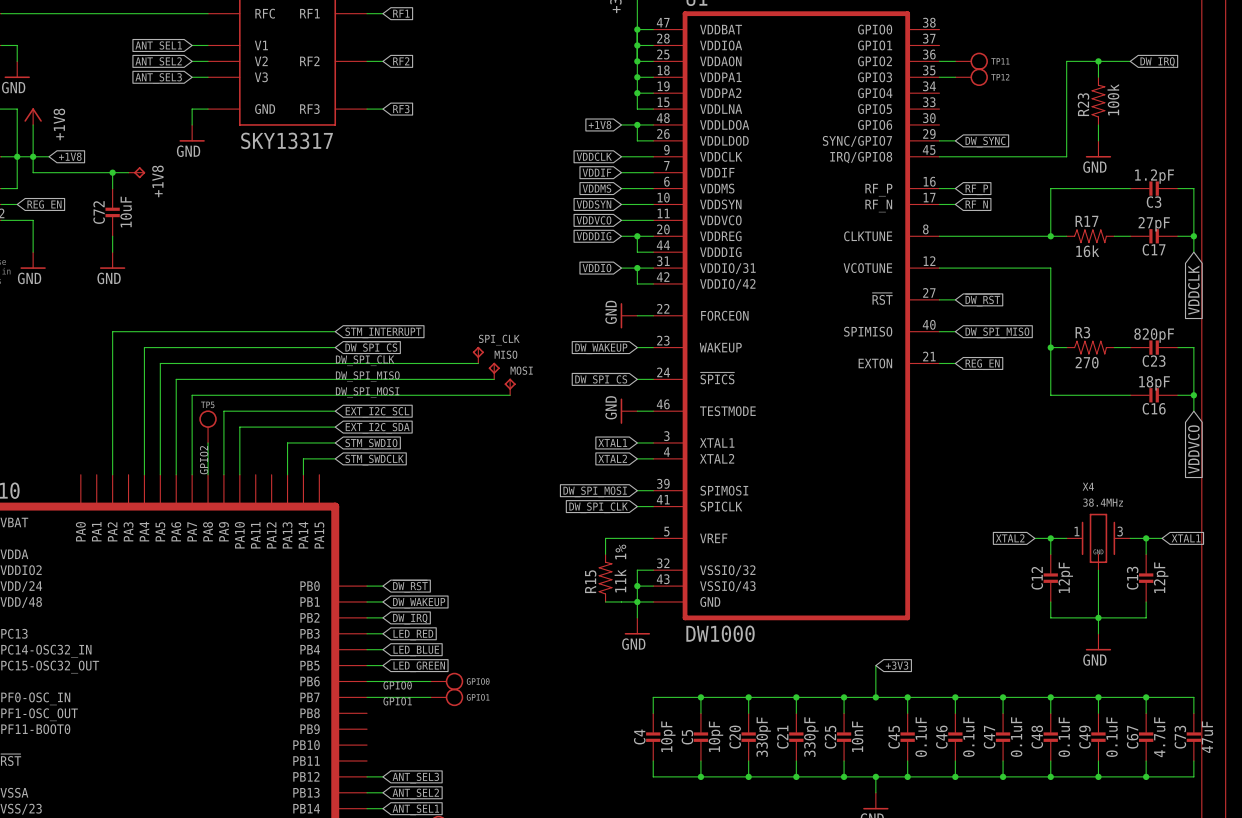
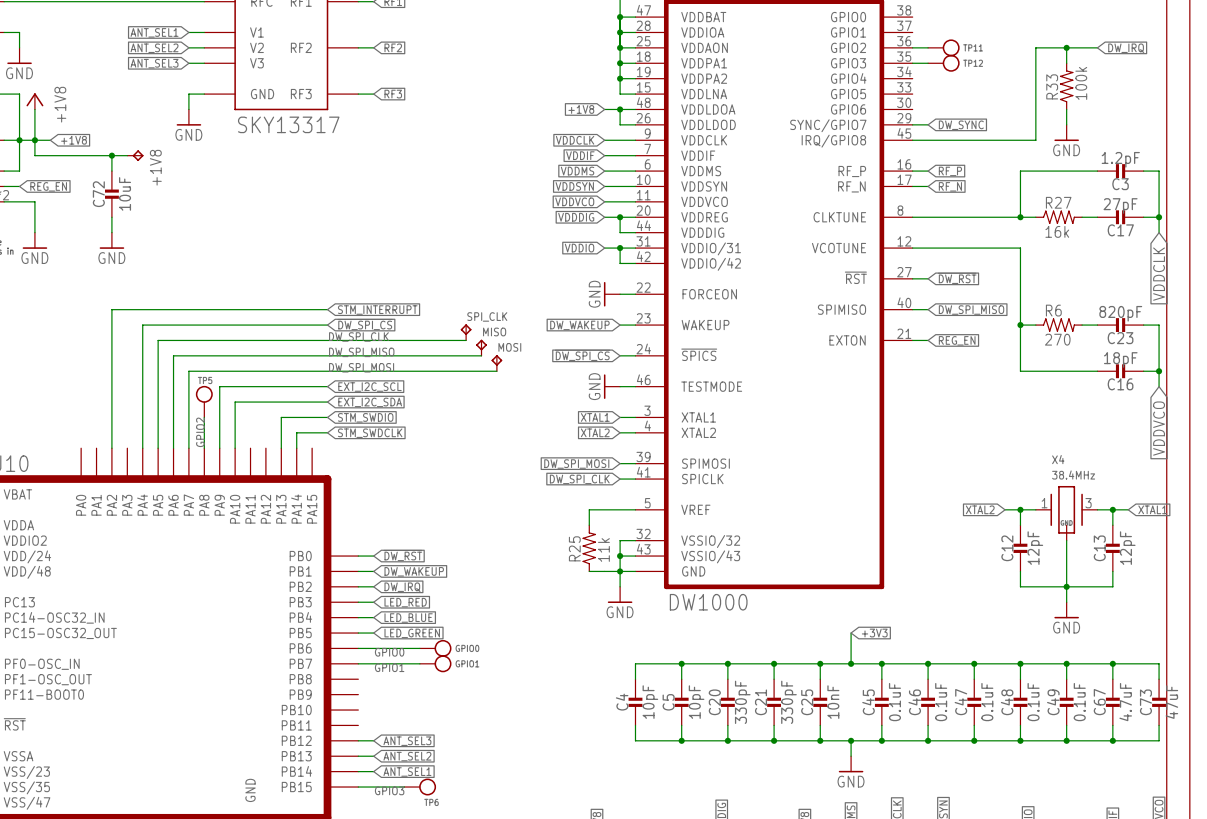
R23 name: R23 (1083, 104) -> R33 (1052, 86)
R17 name: R17 (1086, 221) -> R27 (1058, 202)
R3 name: R3 (1082, 332) -> R6 (1053, 310)
R15 value: 11k 1% (620, 568) -> 11k (603, 550)
R15 name: R15 (590, 581) -> R25 (574, 548)

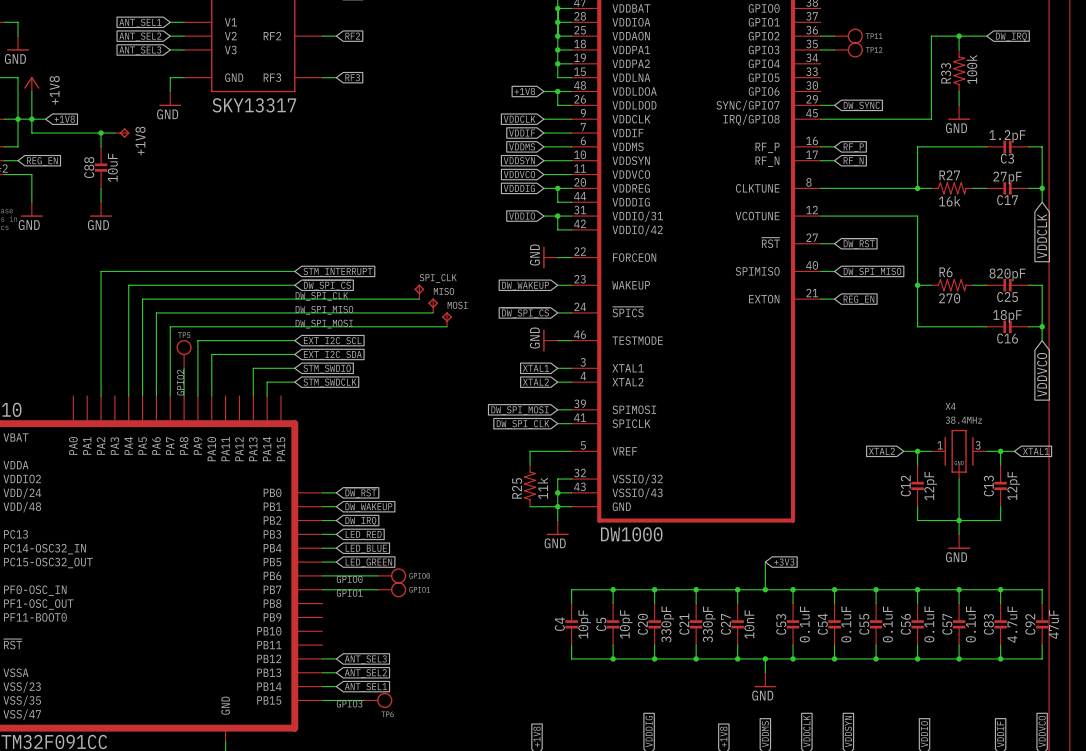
C72 name: C72 (98, 194) -> C88 (89, 167)
C23 name: C23 (1120, 338) -> C25 (1007, 297)
C25 name: C25 (807, 702) -> C27 (725, 624)
C45 name: C45 (868, 702) -> C53 (781, 624)
C46 name: C46 (914, 702) -> C54 (822, 624)
C47 name: C47 (960, 702) -> C55 (864, 624)
C48 name: C48 (1007, 702) -> C56 (905, 624)
C49 name: C49 (1053, 702) -> C57 (947, 624)
C67 name: C67 (1099, 702) -> C83 (988, 624)
C73 name: C73 (1145, 702) -> C92 (1030, 624)

